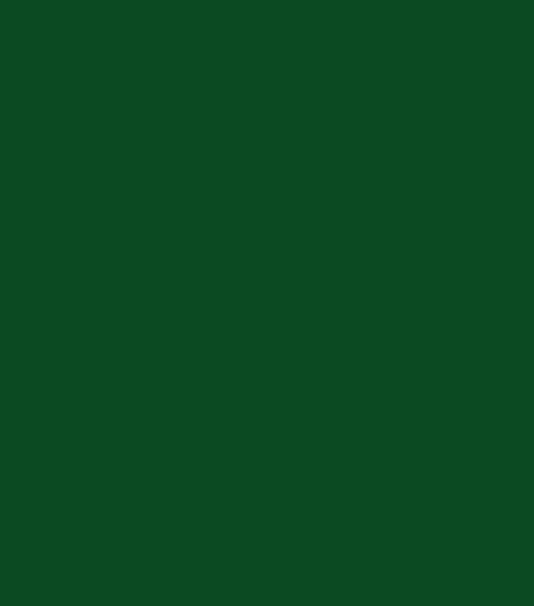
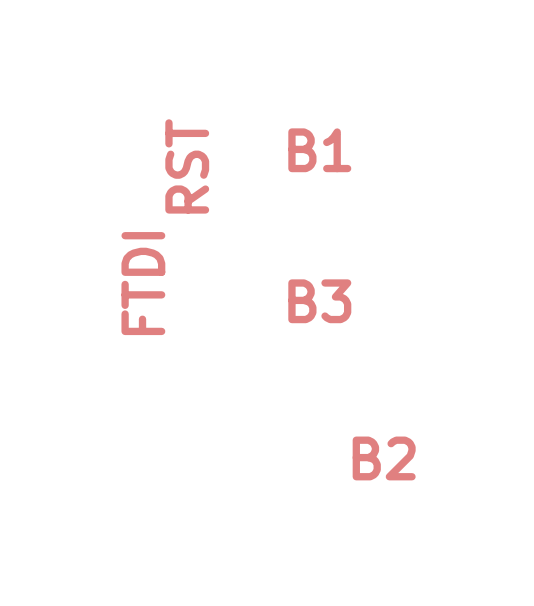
text: none -> B1 (319, 150)
text: none -> RST (187, 166)
text: none -> FTDI (143, 283)
text: none -> B3 (319, 301)
text: none -> B2 (384, 458)

